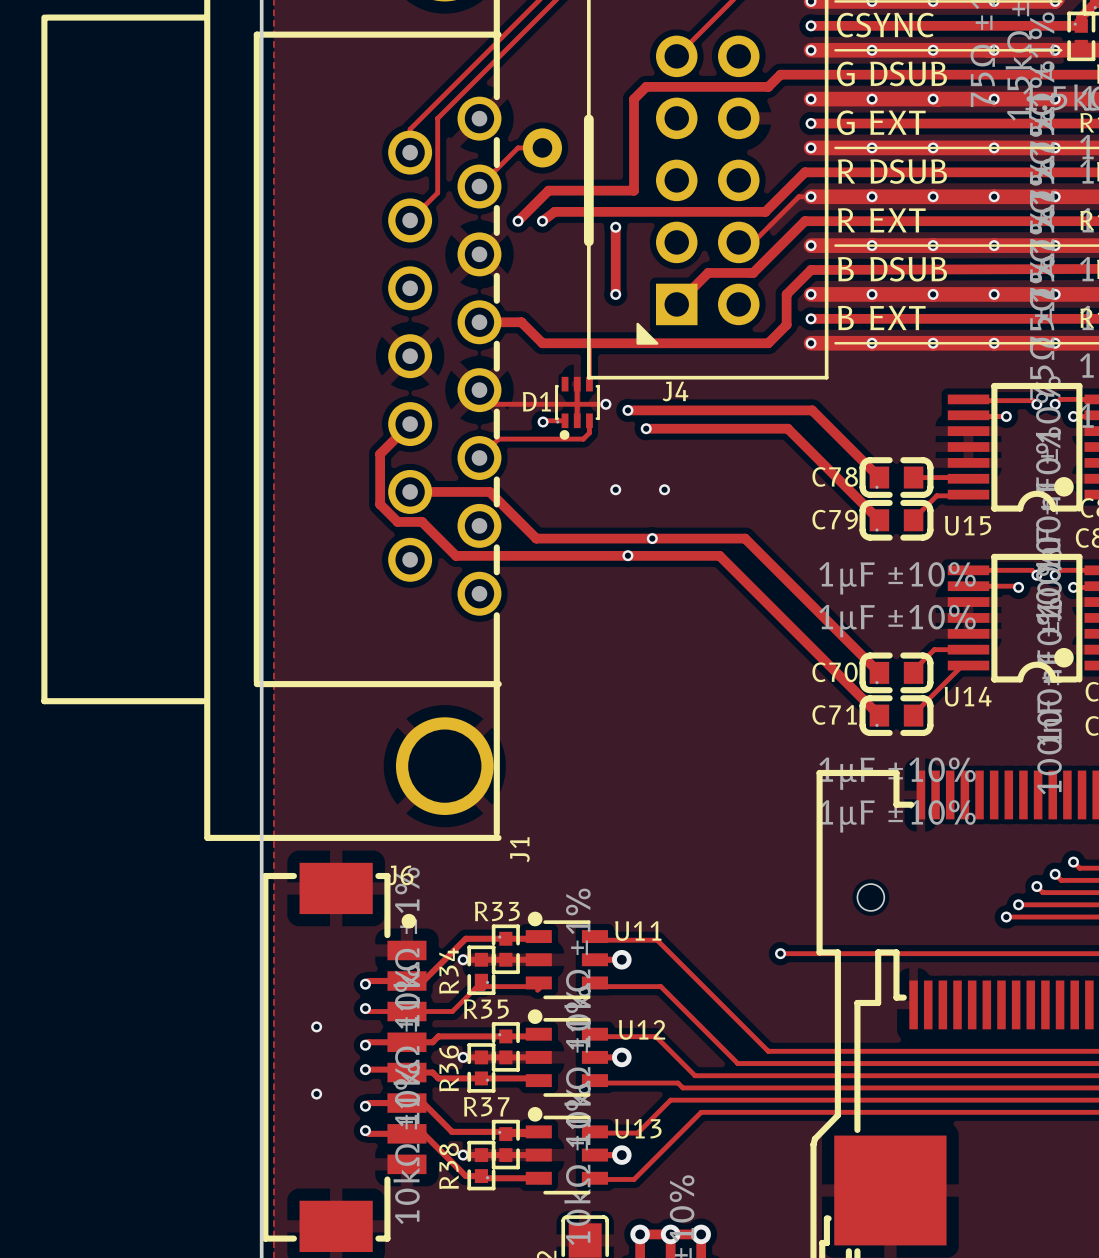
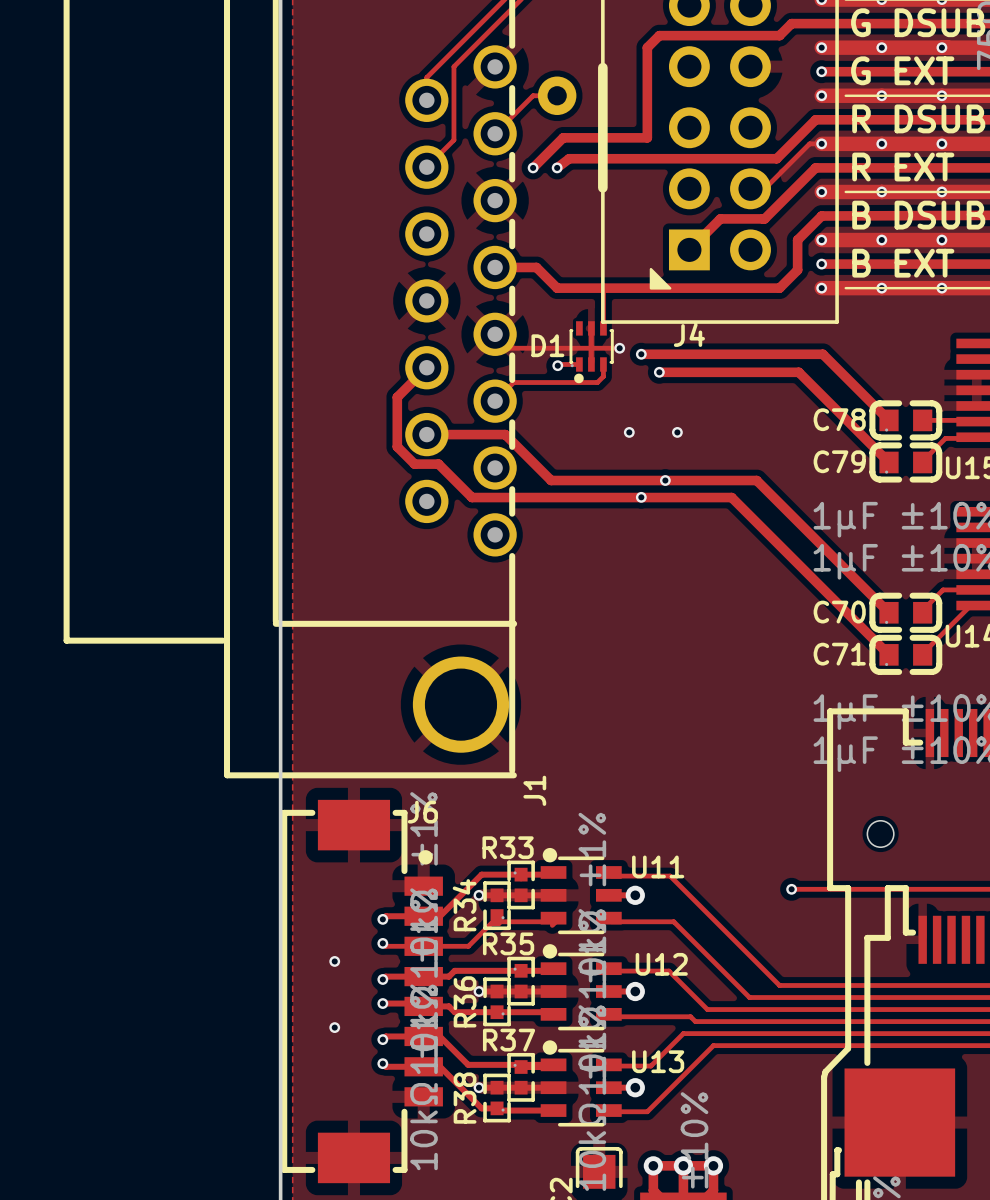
track: (615, 227) (615, 294) -> none
via: (615, 227) -> none
via: (615, 294) -> none

